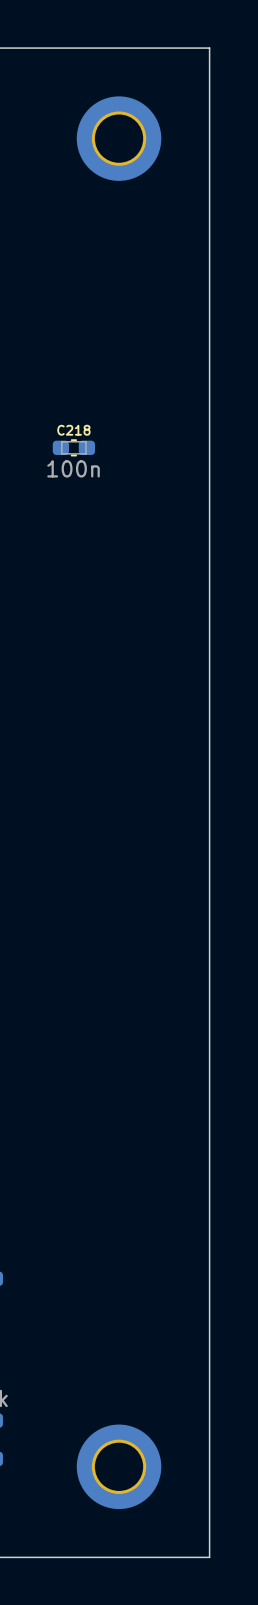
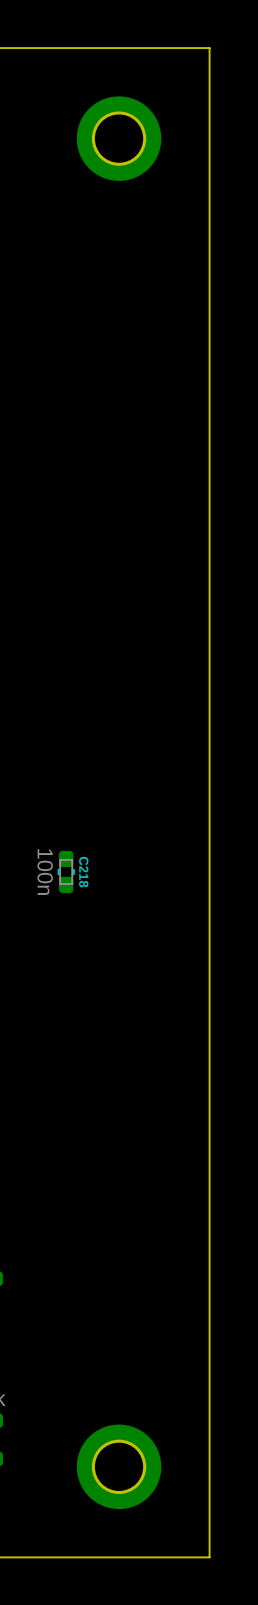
C218 rotation: 0° (73, 447) -> 90° clockwise (66, 871)
C218 position: (73, 447) -> (66, 871)

